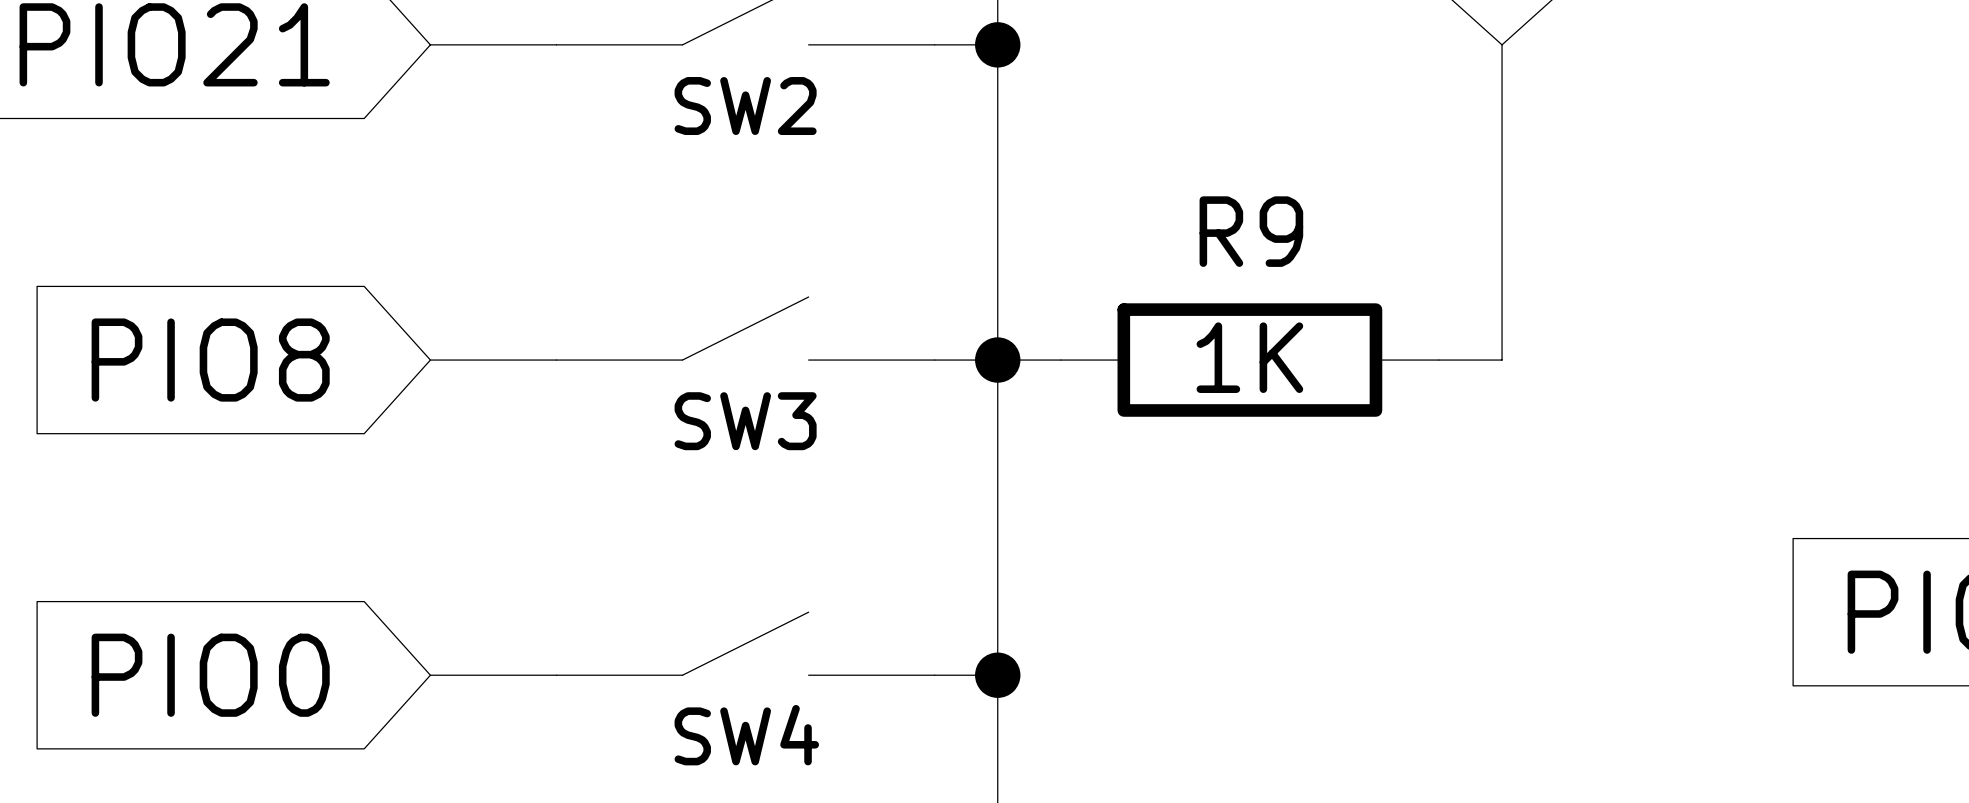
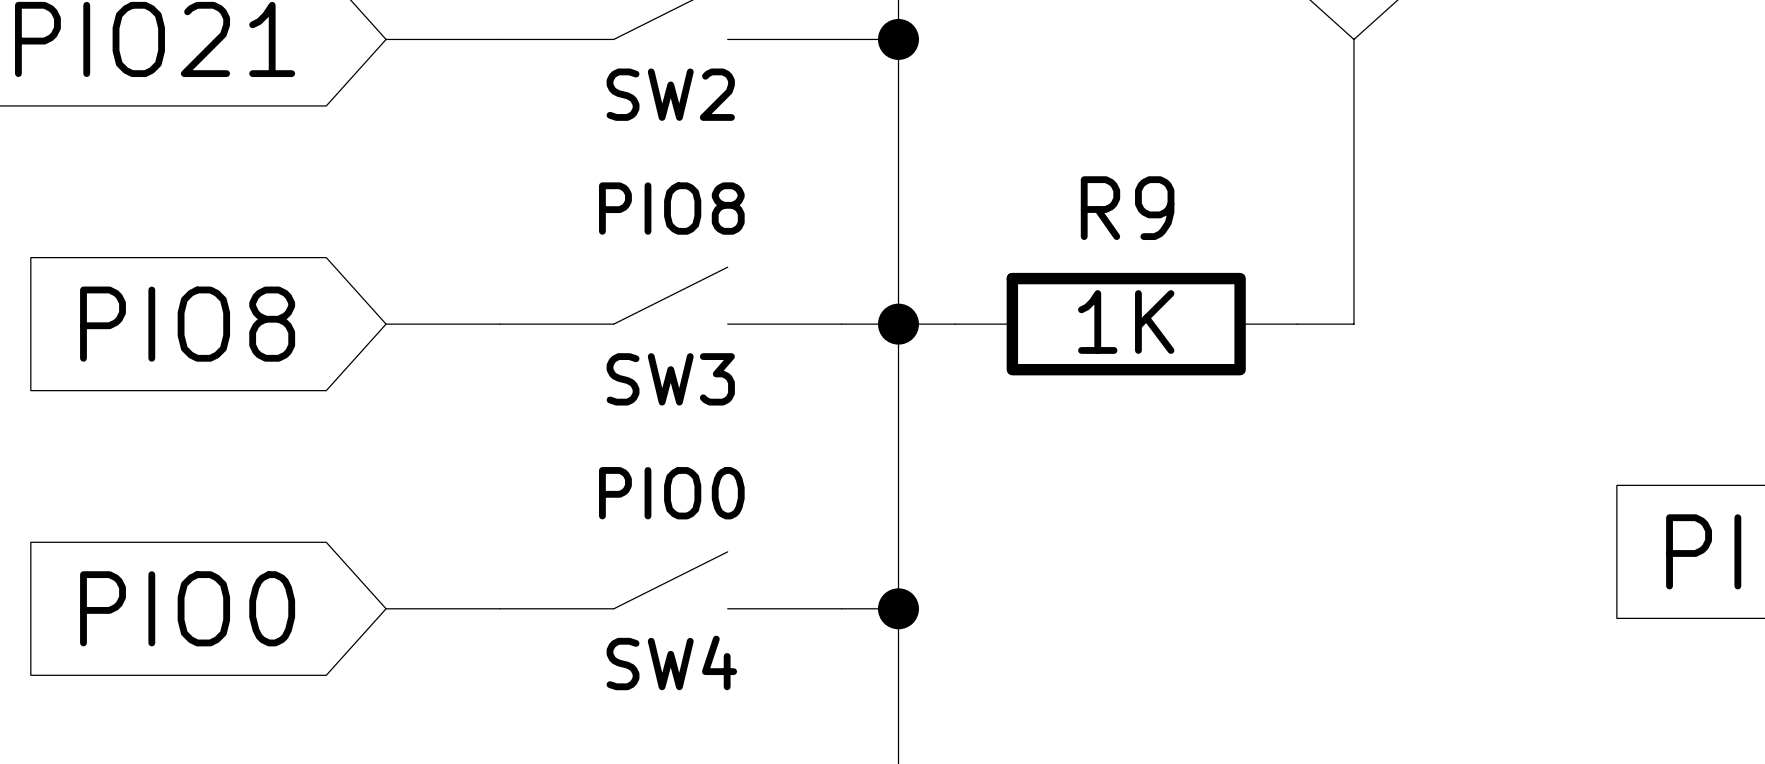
SW3 value: none -> PIO8 (671, 208)
SW4 value: none -> PIO0 (671, 493)

